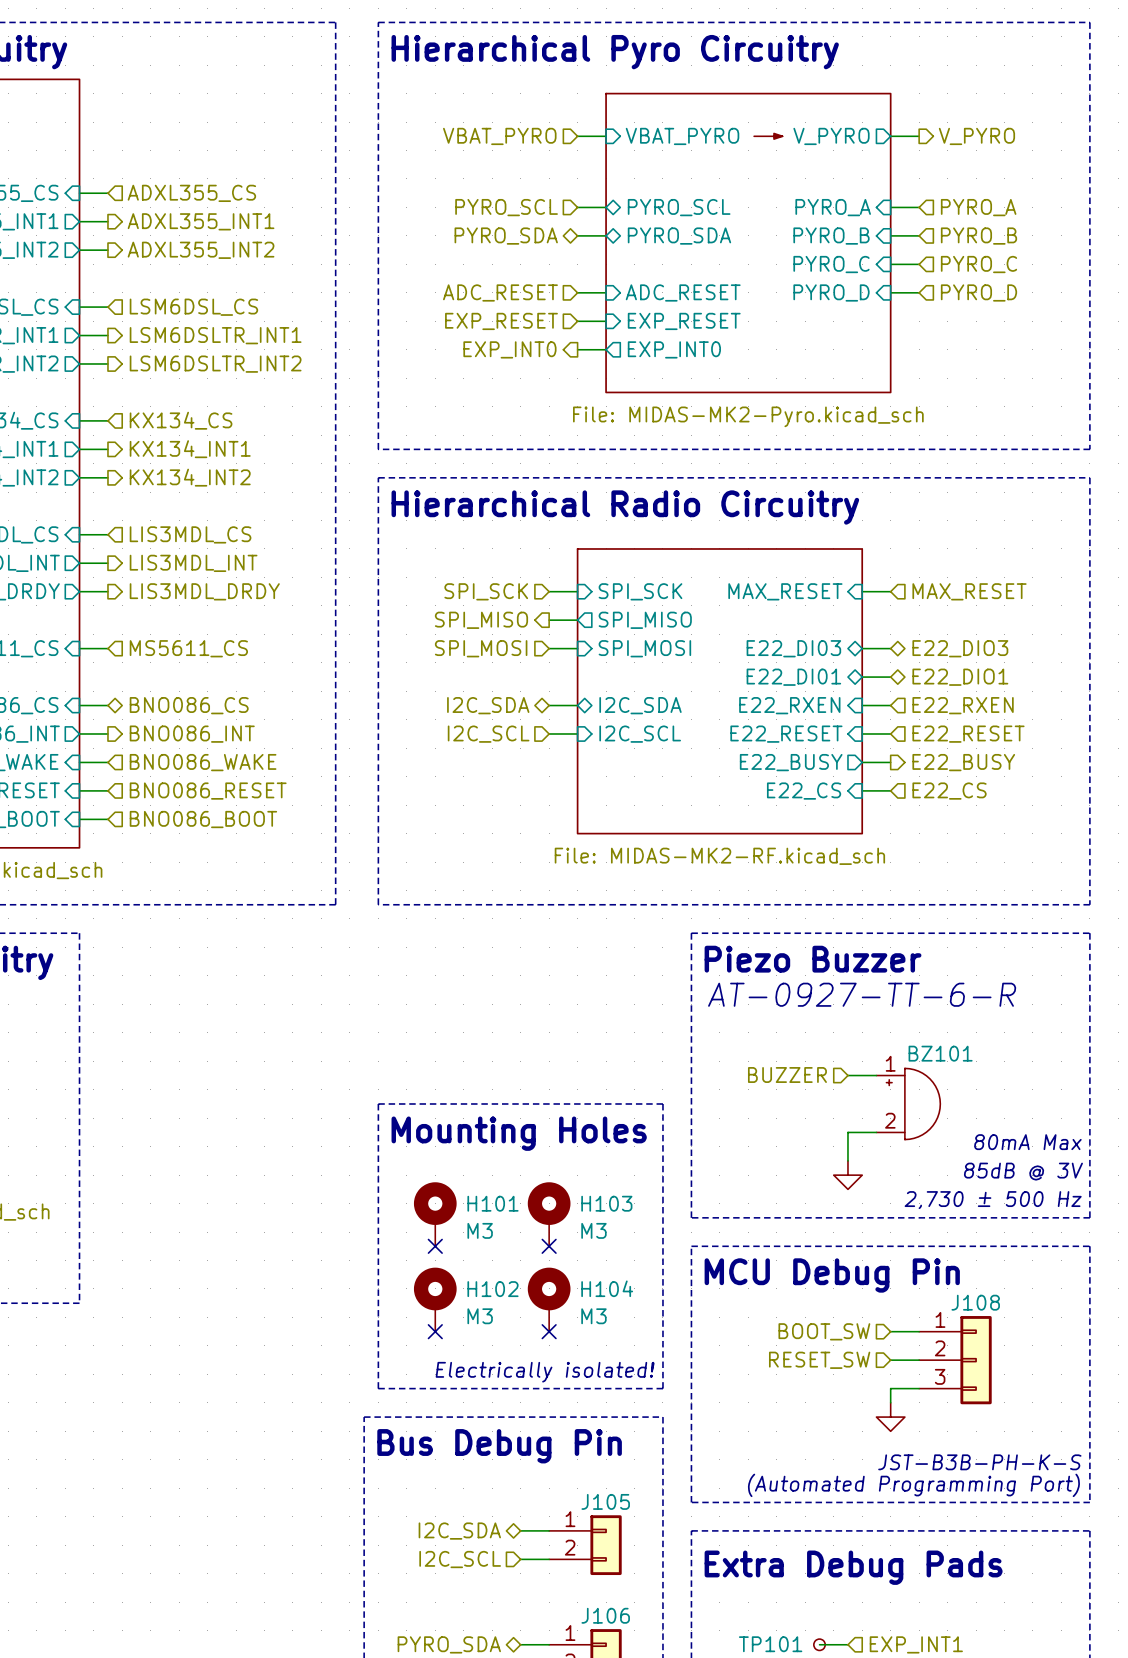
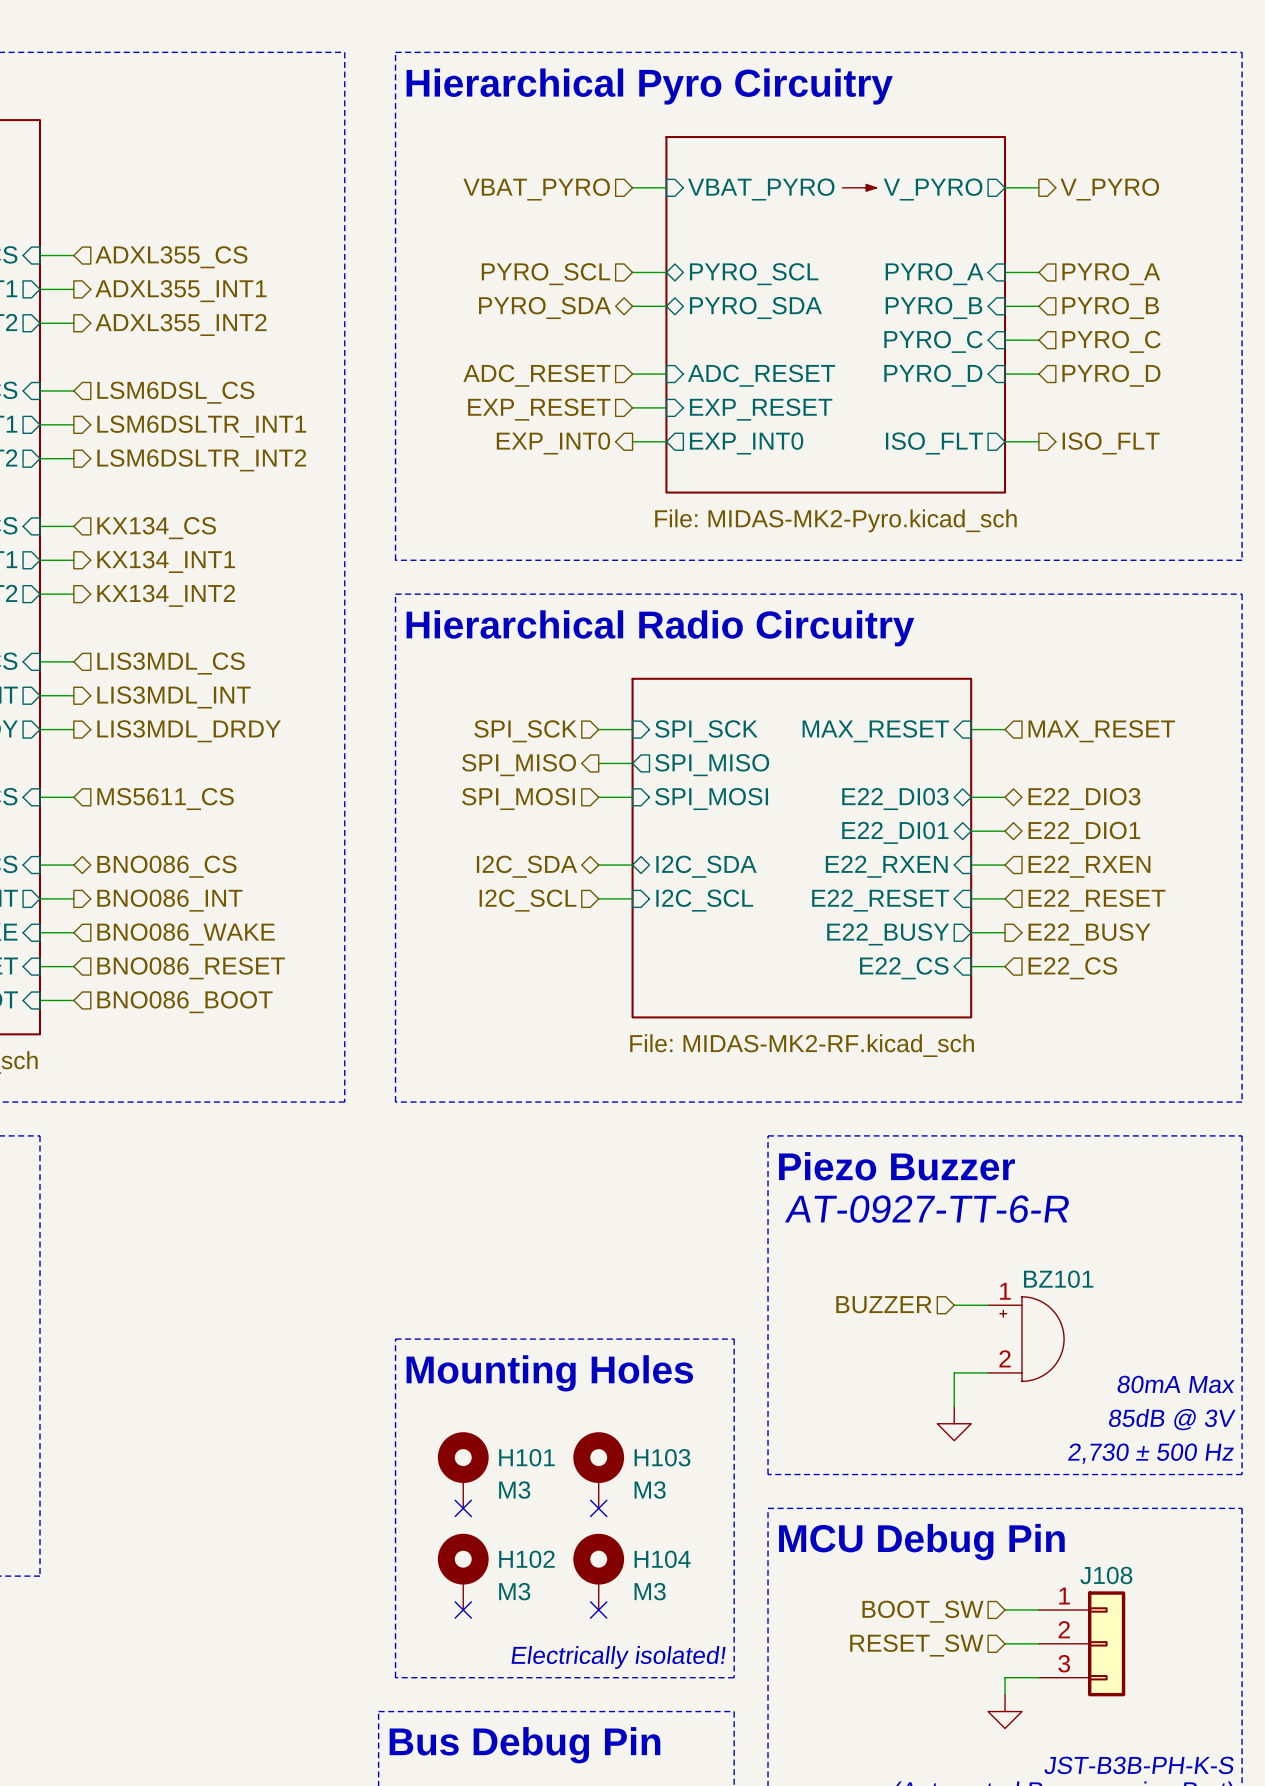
sheet pin: none -> ISO_FLT (934, 443)
wire: none -> (1005, 441) (1038, 441)
hierarchical label: none -> ISO_FLT (1111, 443)

